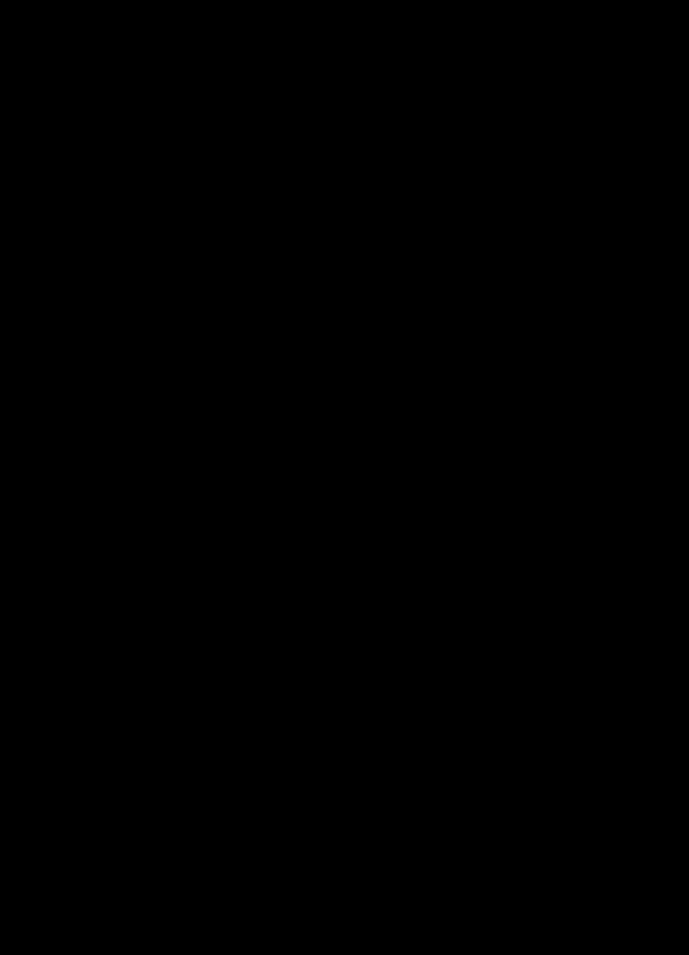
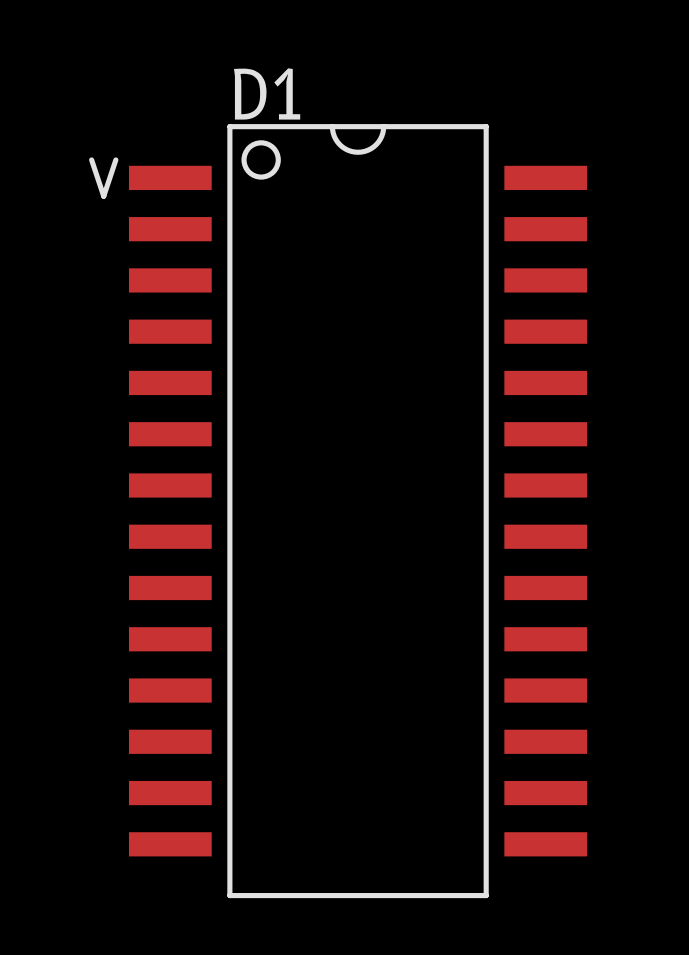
D1: none -> (338, 511)

